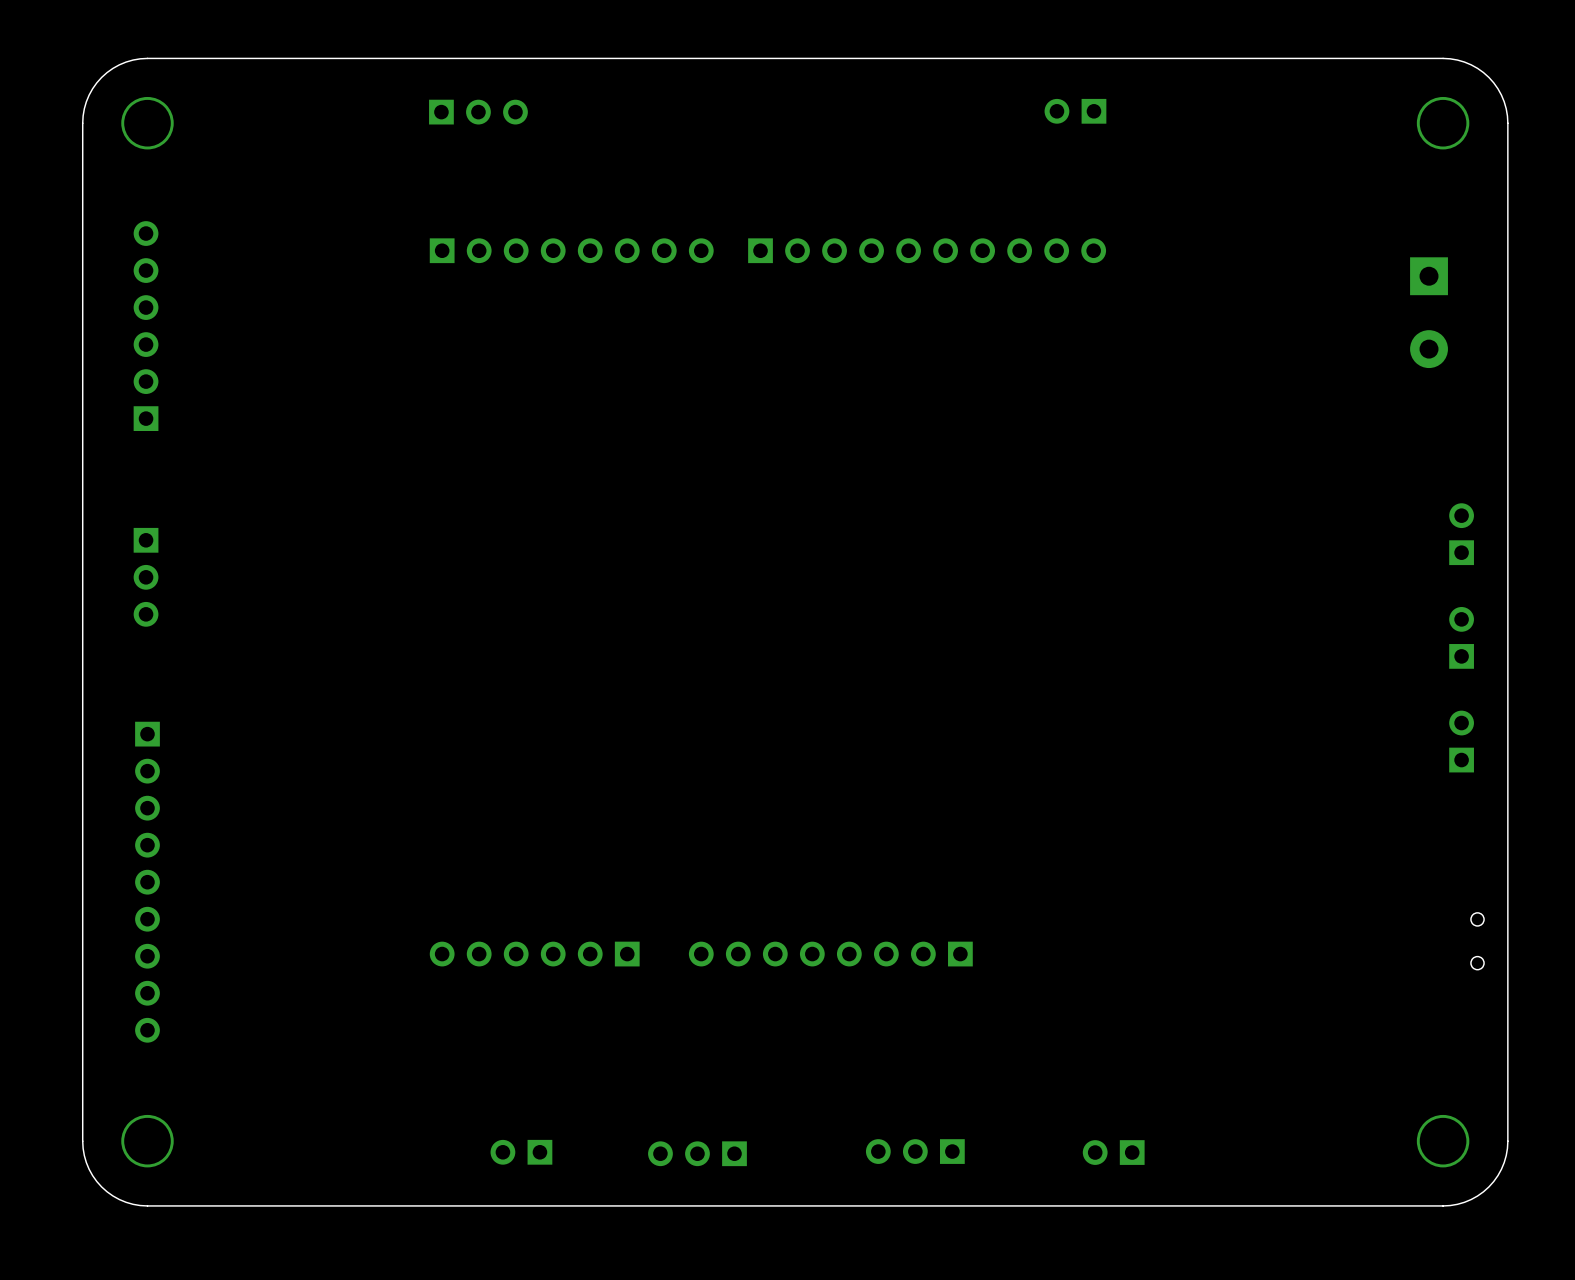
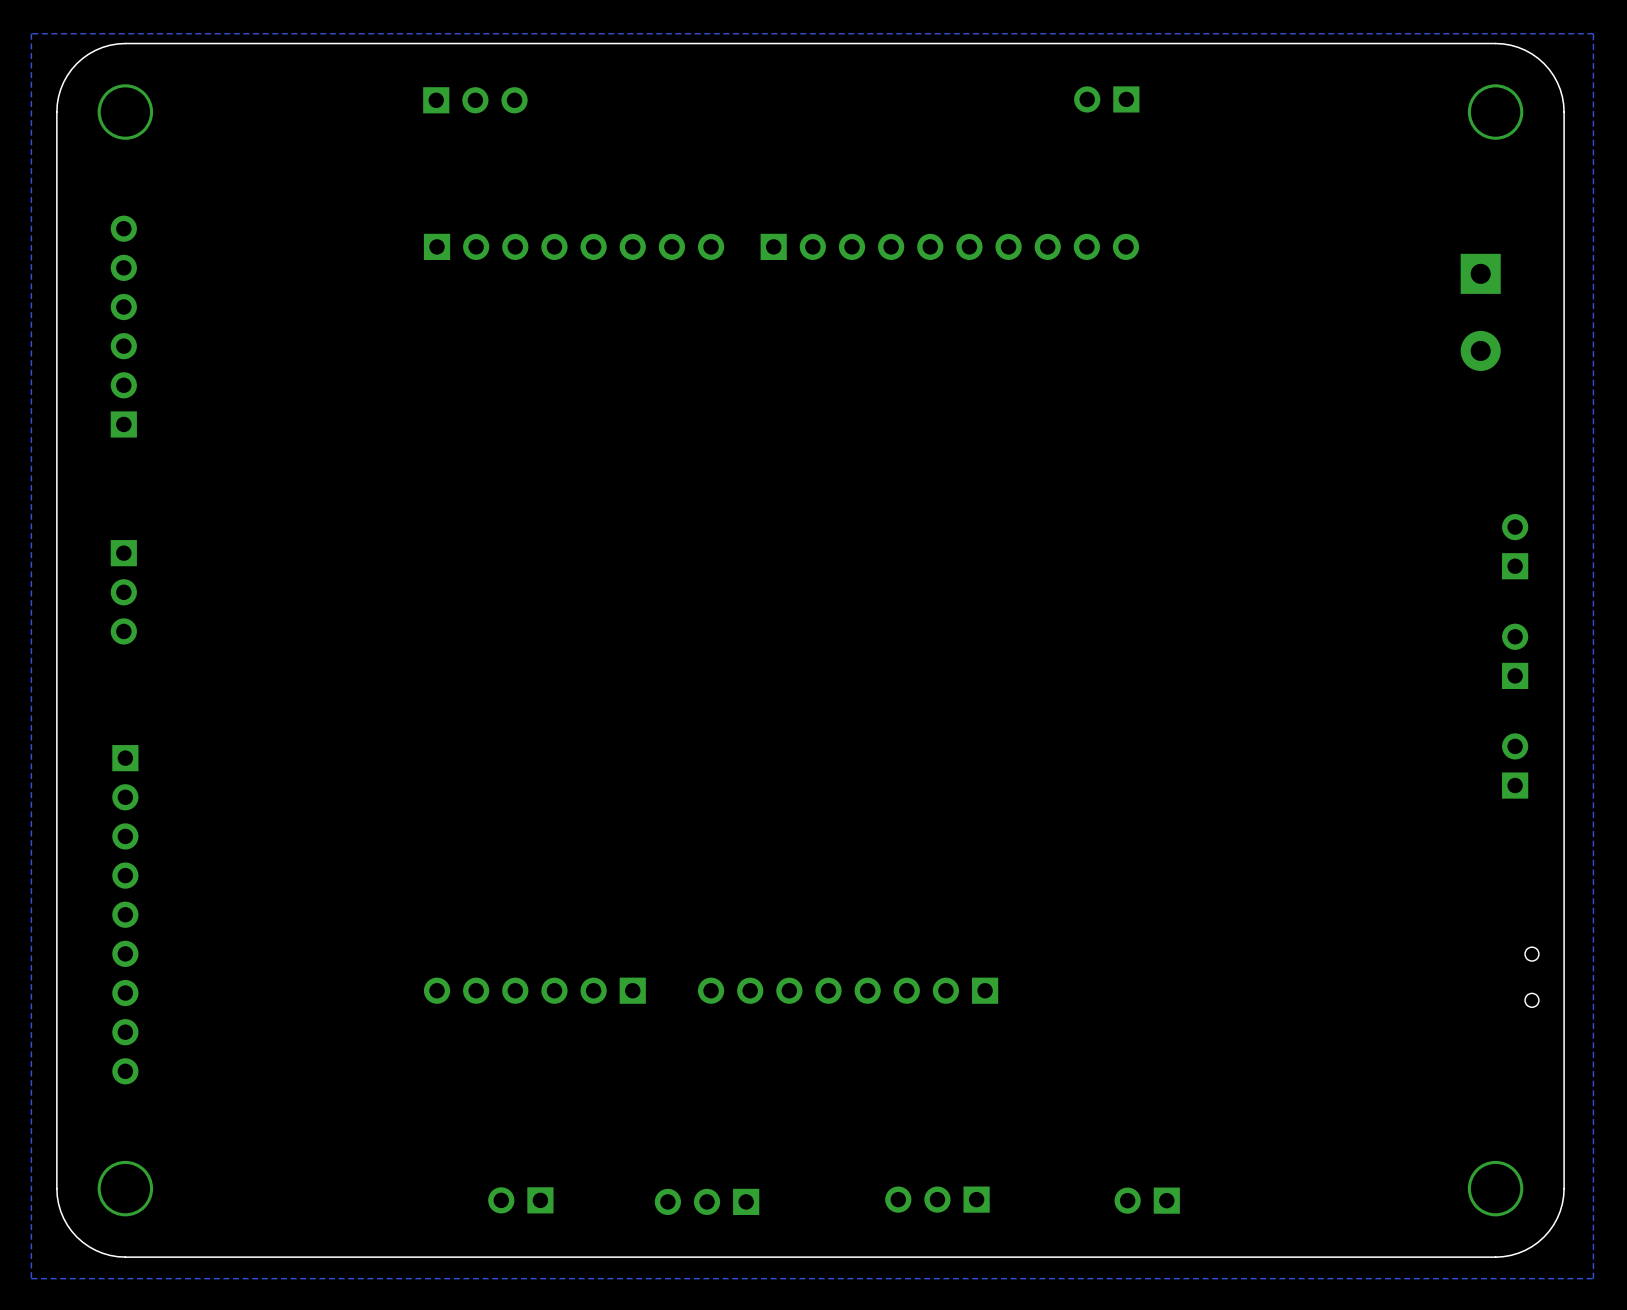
zone outline: none -> (1593, 33) (1593, 1278) (31, 1278) (31, 33) (1593, 33)

